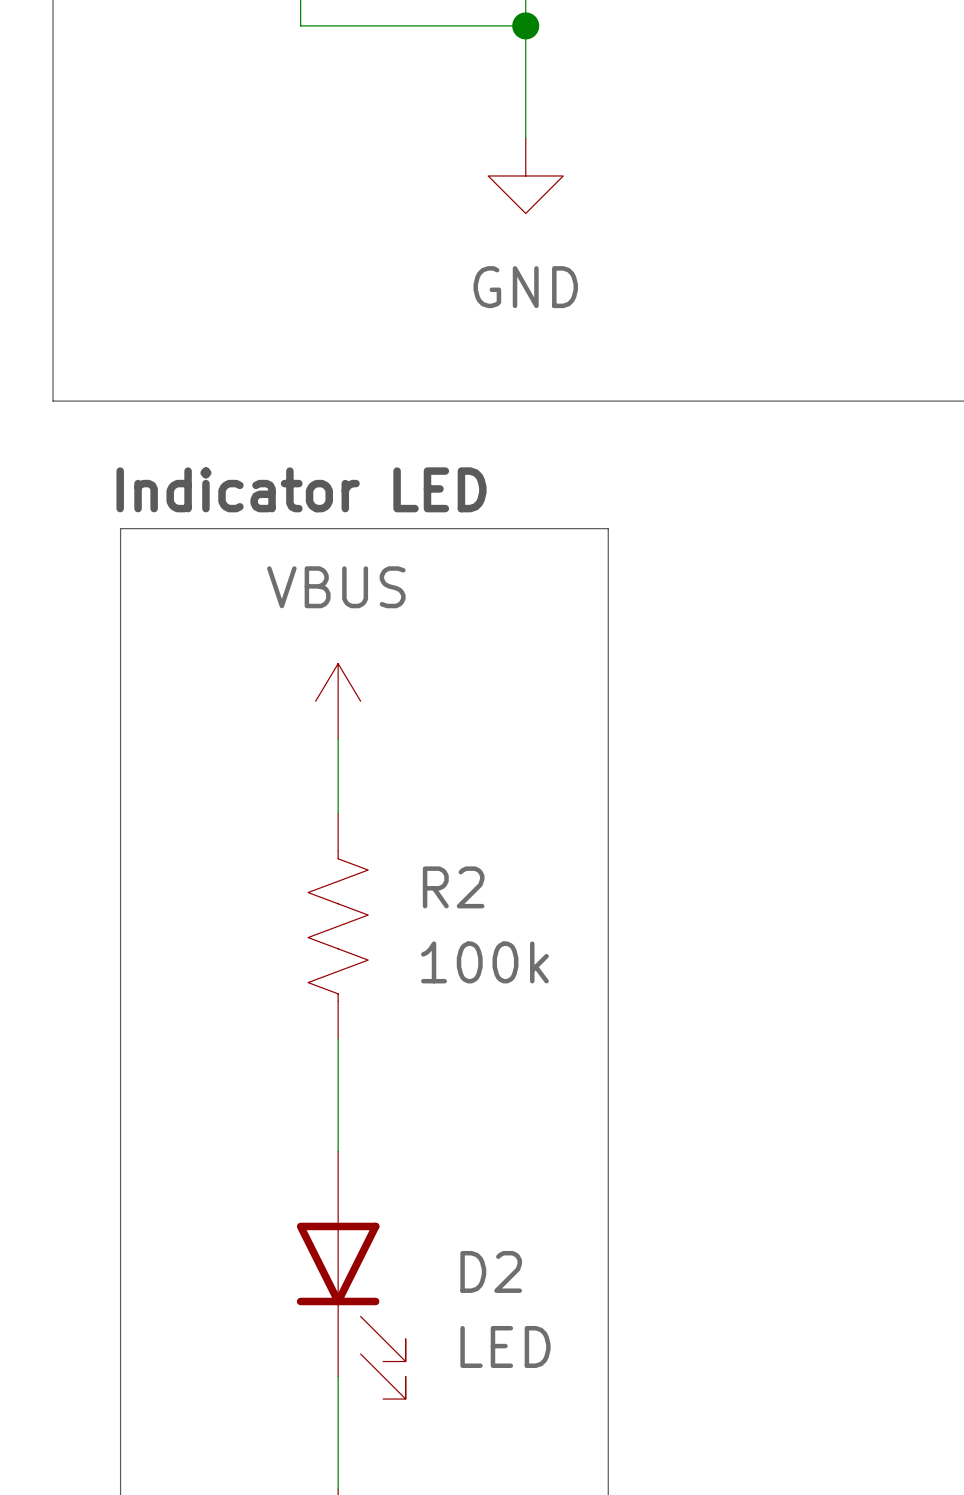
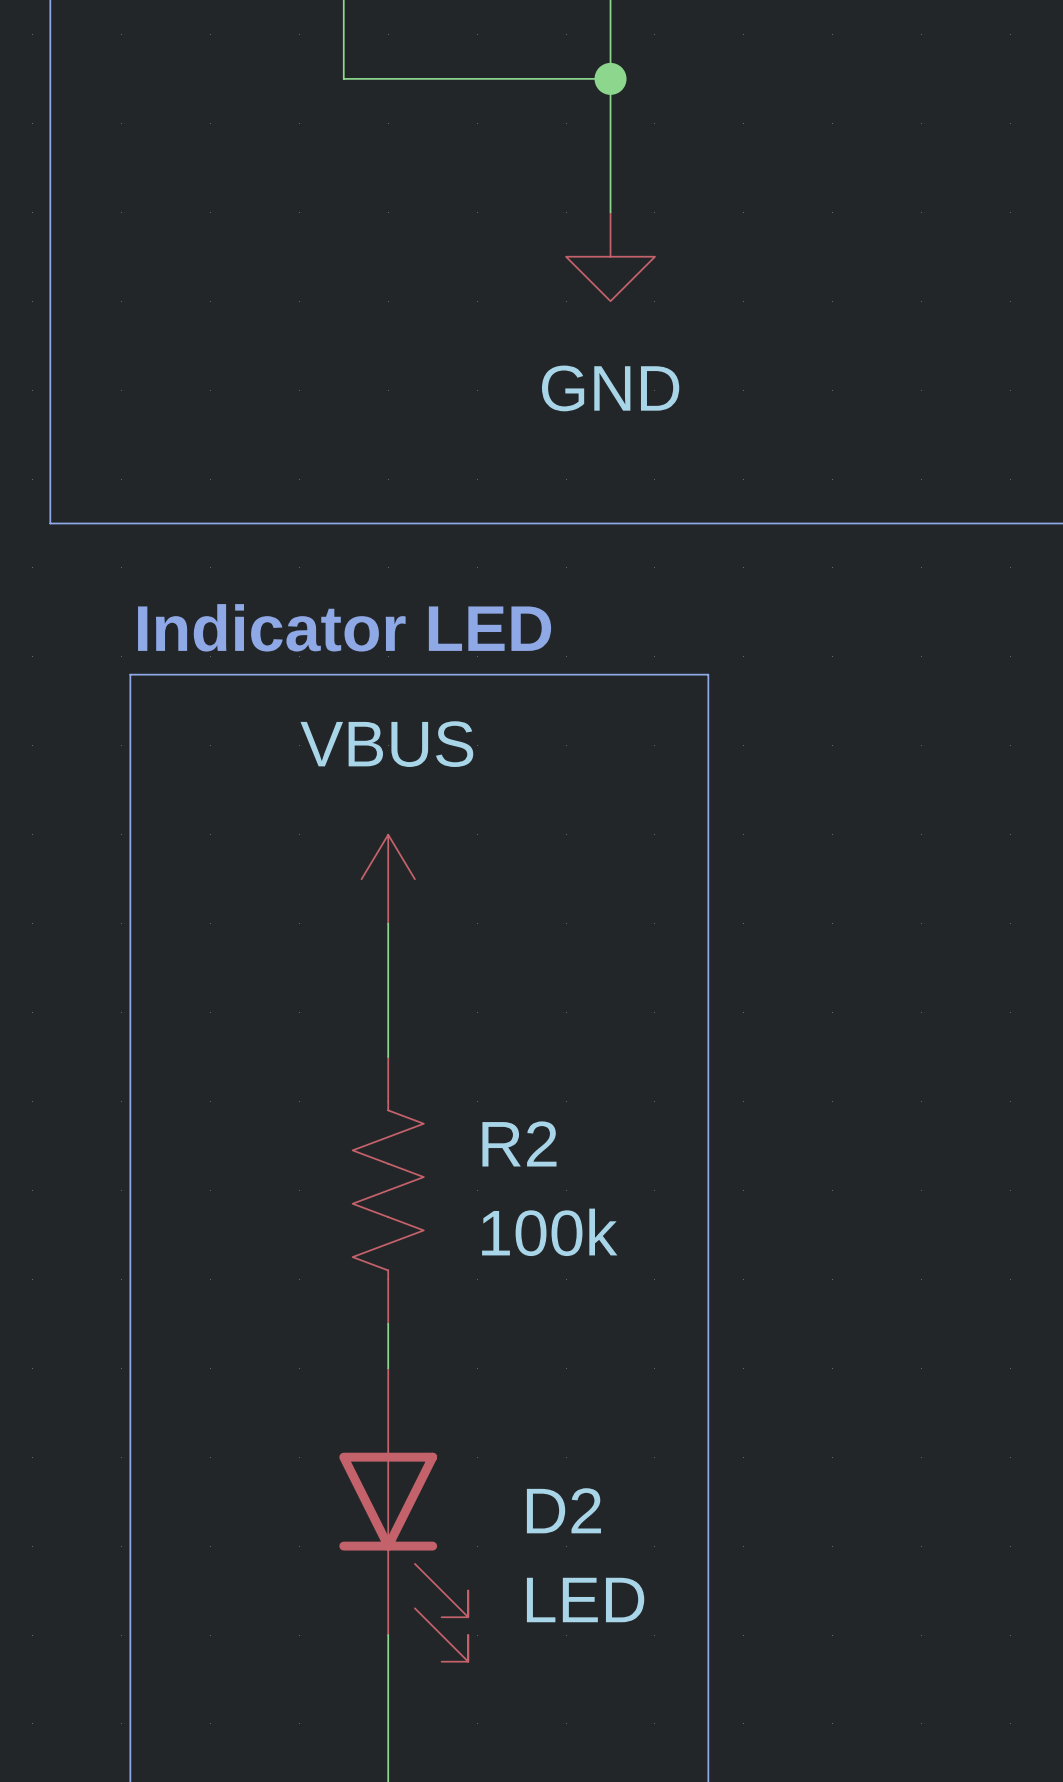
R2 position: (338, 926) -> (388, 1190)
D2 position: (351, 1275) -> (403, 1514)

